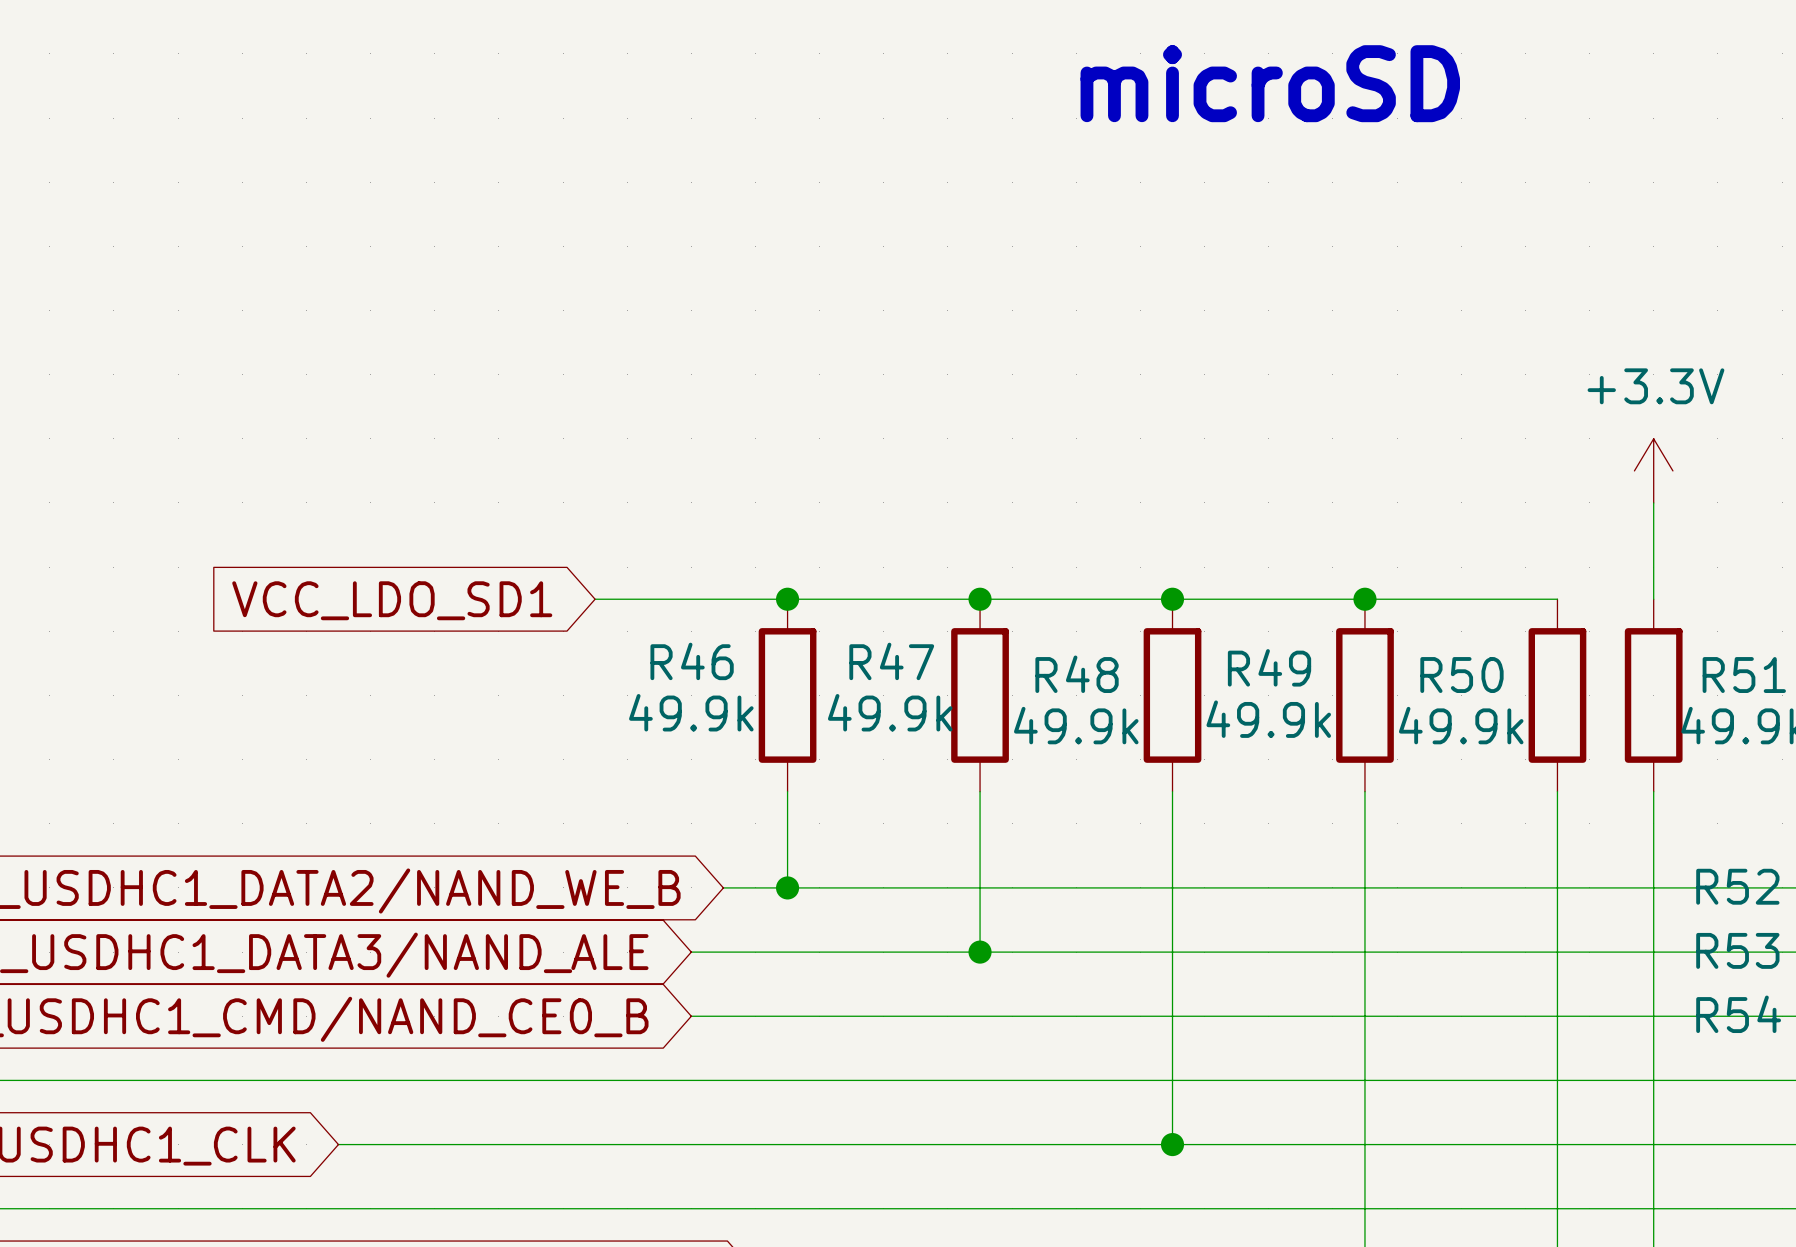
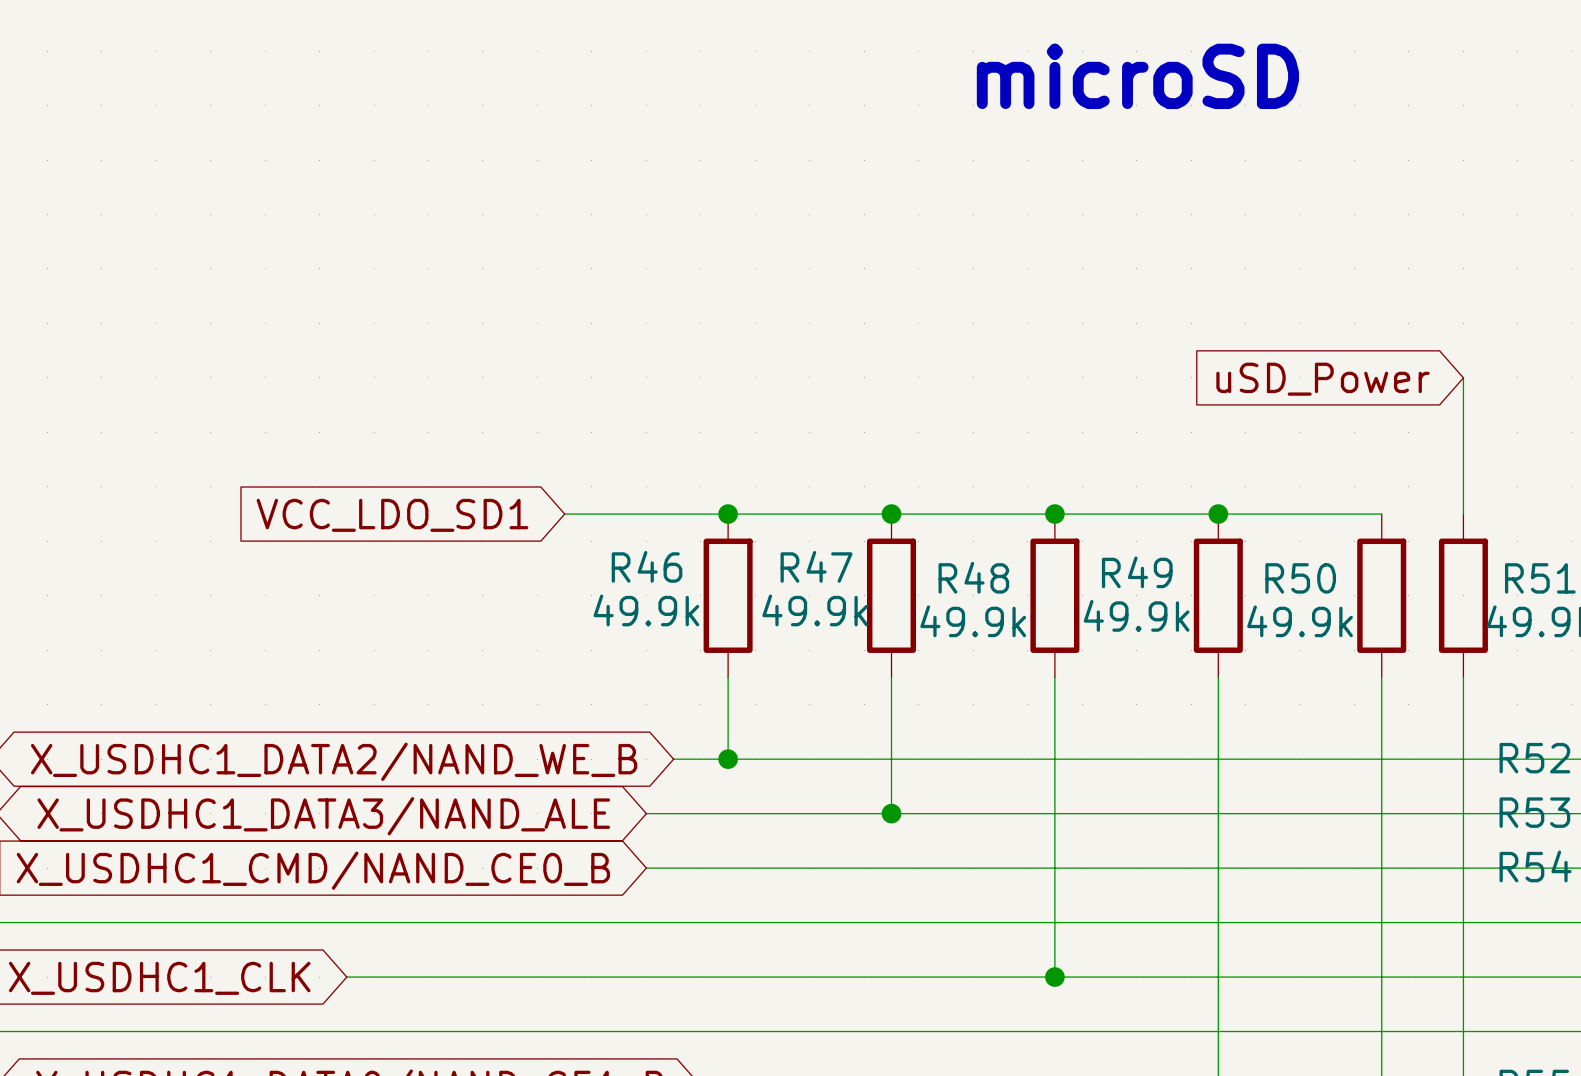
global label: none -> uSD_Power (1322, 379)
power symbol: +3.3V (1653, 470) -> none

